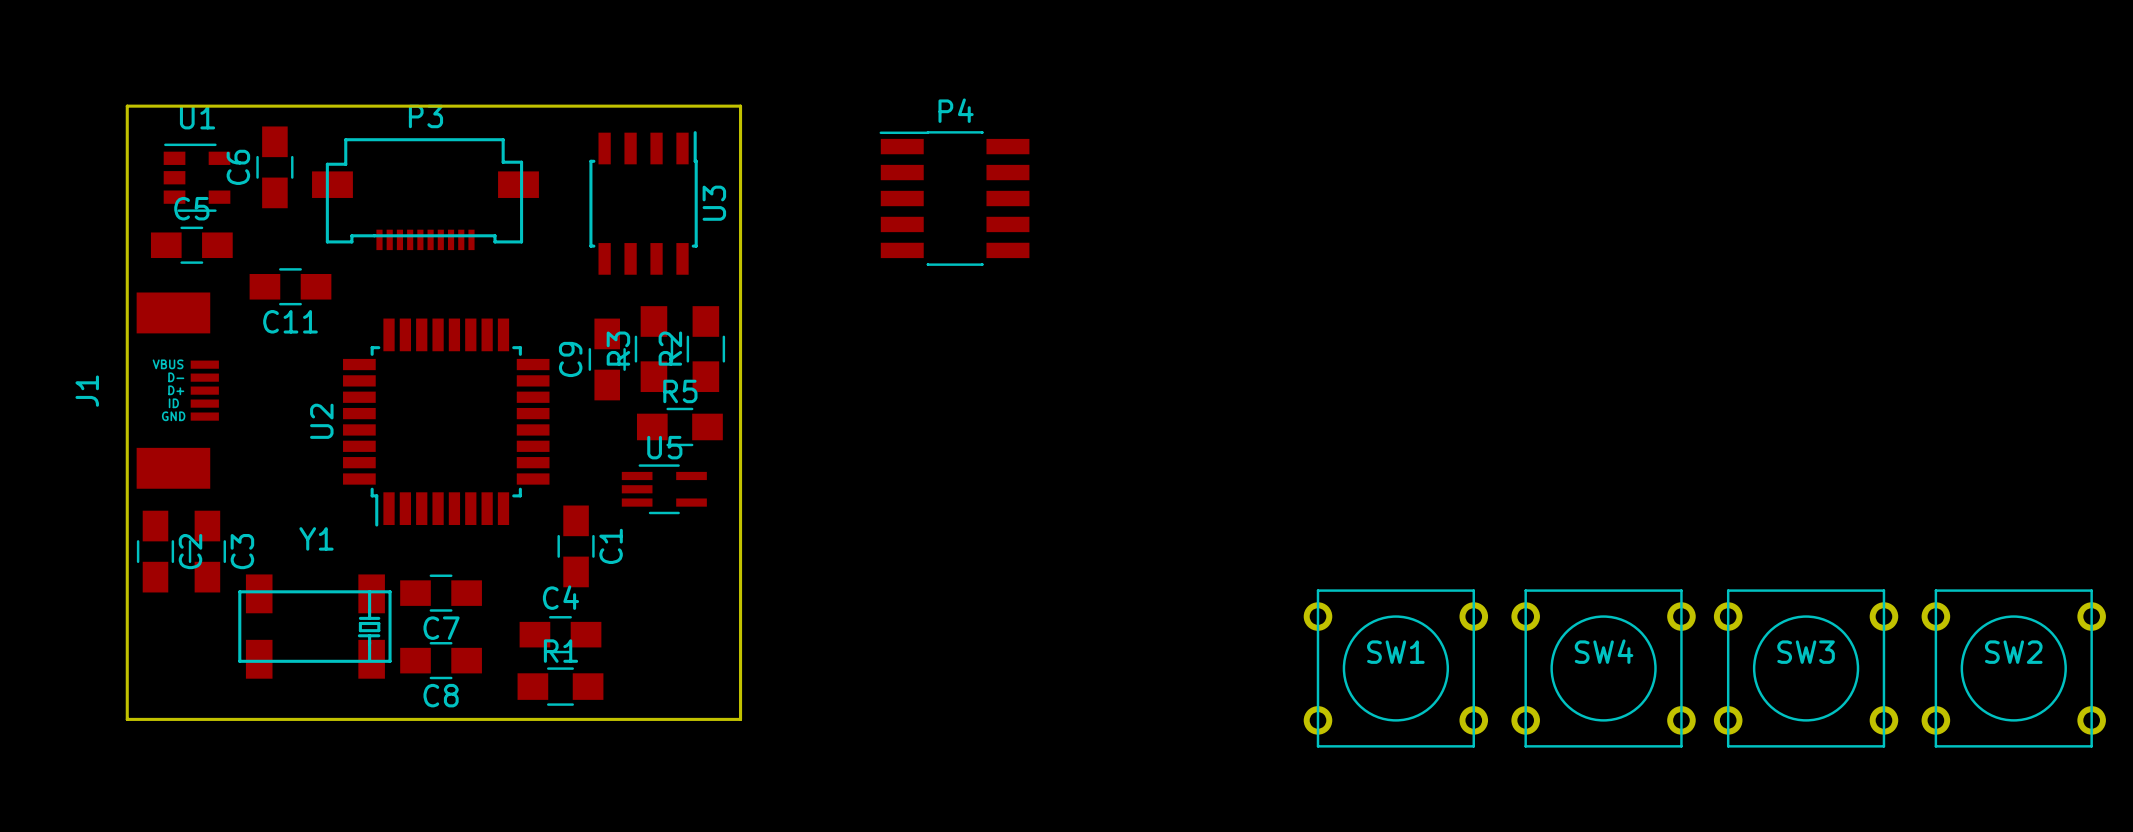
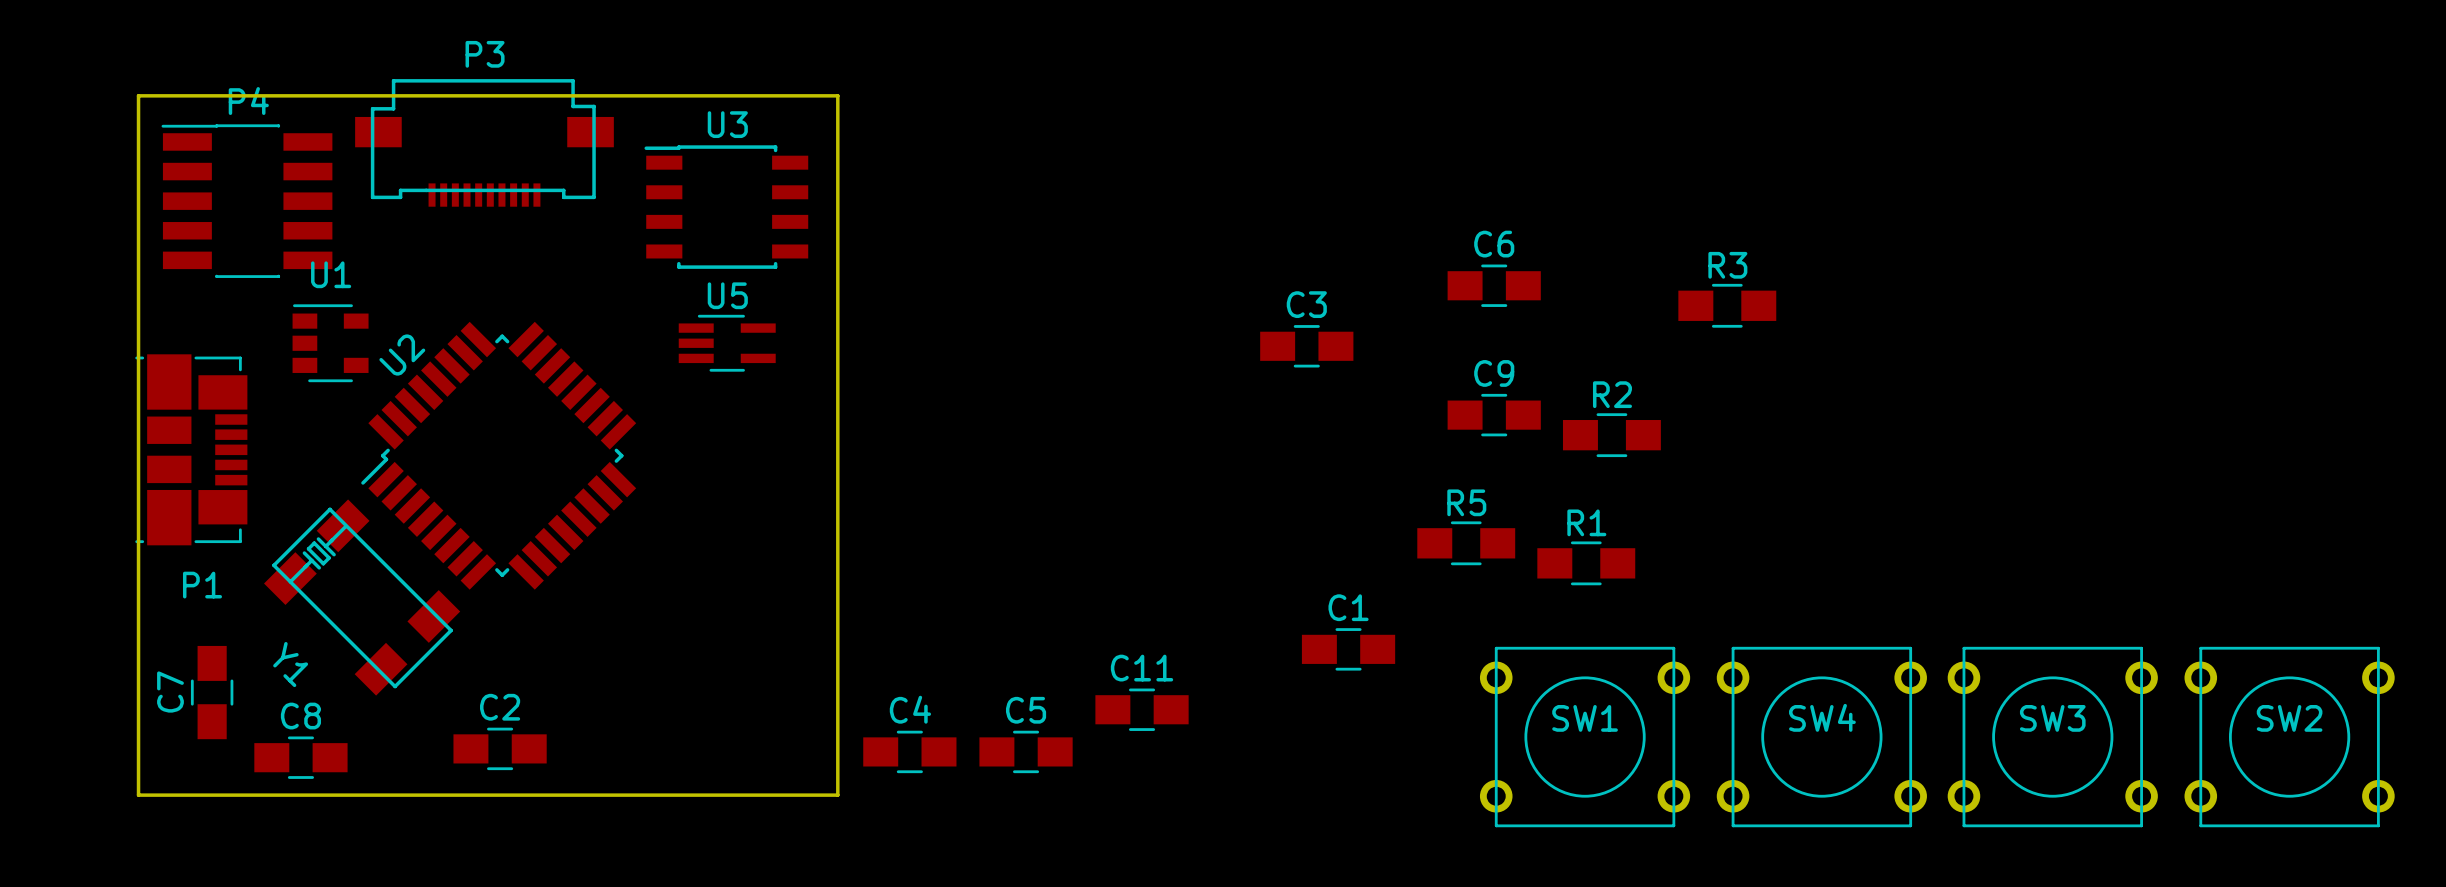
C6 rotation: 0° (274, 167) -> 90° clockwise (1494, 285)
C6 position: (274, 167) -> (1494, 285)
U1 position: (197, 177) -> (330, 343)
P3 position: (425, 194) -> (484, 142)
P4 position: (954, 198) -> (246, 201)
U3 rotation: 0° (643, 202) -> 90° counterclockwise (726, 207)
C5 position: (191, 245) -> (1026, 751)
C11 position: (290, 286) -> (1142, 709)
C11 name position: C11 (290, 321) -> C11 (1142, 668)
R3 rotation: 0° (653, 349) -> 90° clockwise (1727, 305)
R3 position: (653, 349) -> (1727, 305)
R2 rotation: 0° (705, 349) -> 90° clockwise (1611, 435)
R2 position: (705, 349) -> (1611, 435)
C9 rotation: 0° (607, 359) -> 90° clockwise (1494, 415)
C9 position: (607, 359) -> (1494, 415)
J1: (177, 390) -> none
P1: none -> (191, 449)
U2 rotation: 0° (446, 422) -> 45° clockwise (498, 455)
R5 position: (679, 426) -> (1466, 543)
U5 position: (664, 489) -> (727, 343)
C1 rotation: 0° (576, 546) -> 90° clockwise (1348, 649)
C1 position: (576, 546) -> (1348, 649)
C1 name position: C1 (611, 546) -> C1 (1348, 607)
C2 rotation: 0° (155, 551) -> 90° clockwise (500, 748)
C2 position: (155, 551) -> (500, 748)
C2 name position: C2 (190, 551) -> C2 (500, 707)
C3 rotation: 0° (207, 551) -> 90° clockwise (1306, 346)
C3 position: (207, 551) -> (1306, 346)
C3 name position: C3 (242, 551) -> C3 (1306, 304)
C7 rotation: 0° (441, 593) -> 90° clockwise (212, 692)
C7 position: (441, 593) -> (212, 692)
Y1 rotation: 0° (314, 626) -> 135° counterclockwise (362, 597)
C4 position: (560, 634) -> (909, 751)
C8 position: (441, 660) -> (300, 757)
R1 position: (560, 686) -> (1586, 563)
C8 name position: C8 (441, 695) -> C8 (300, 716)

